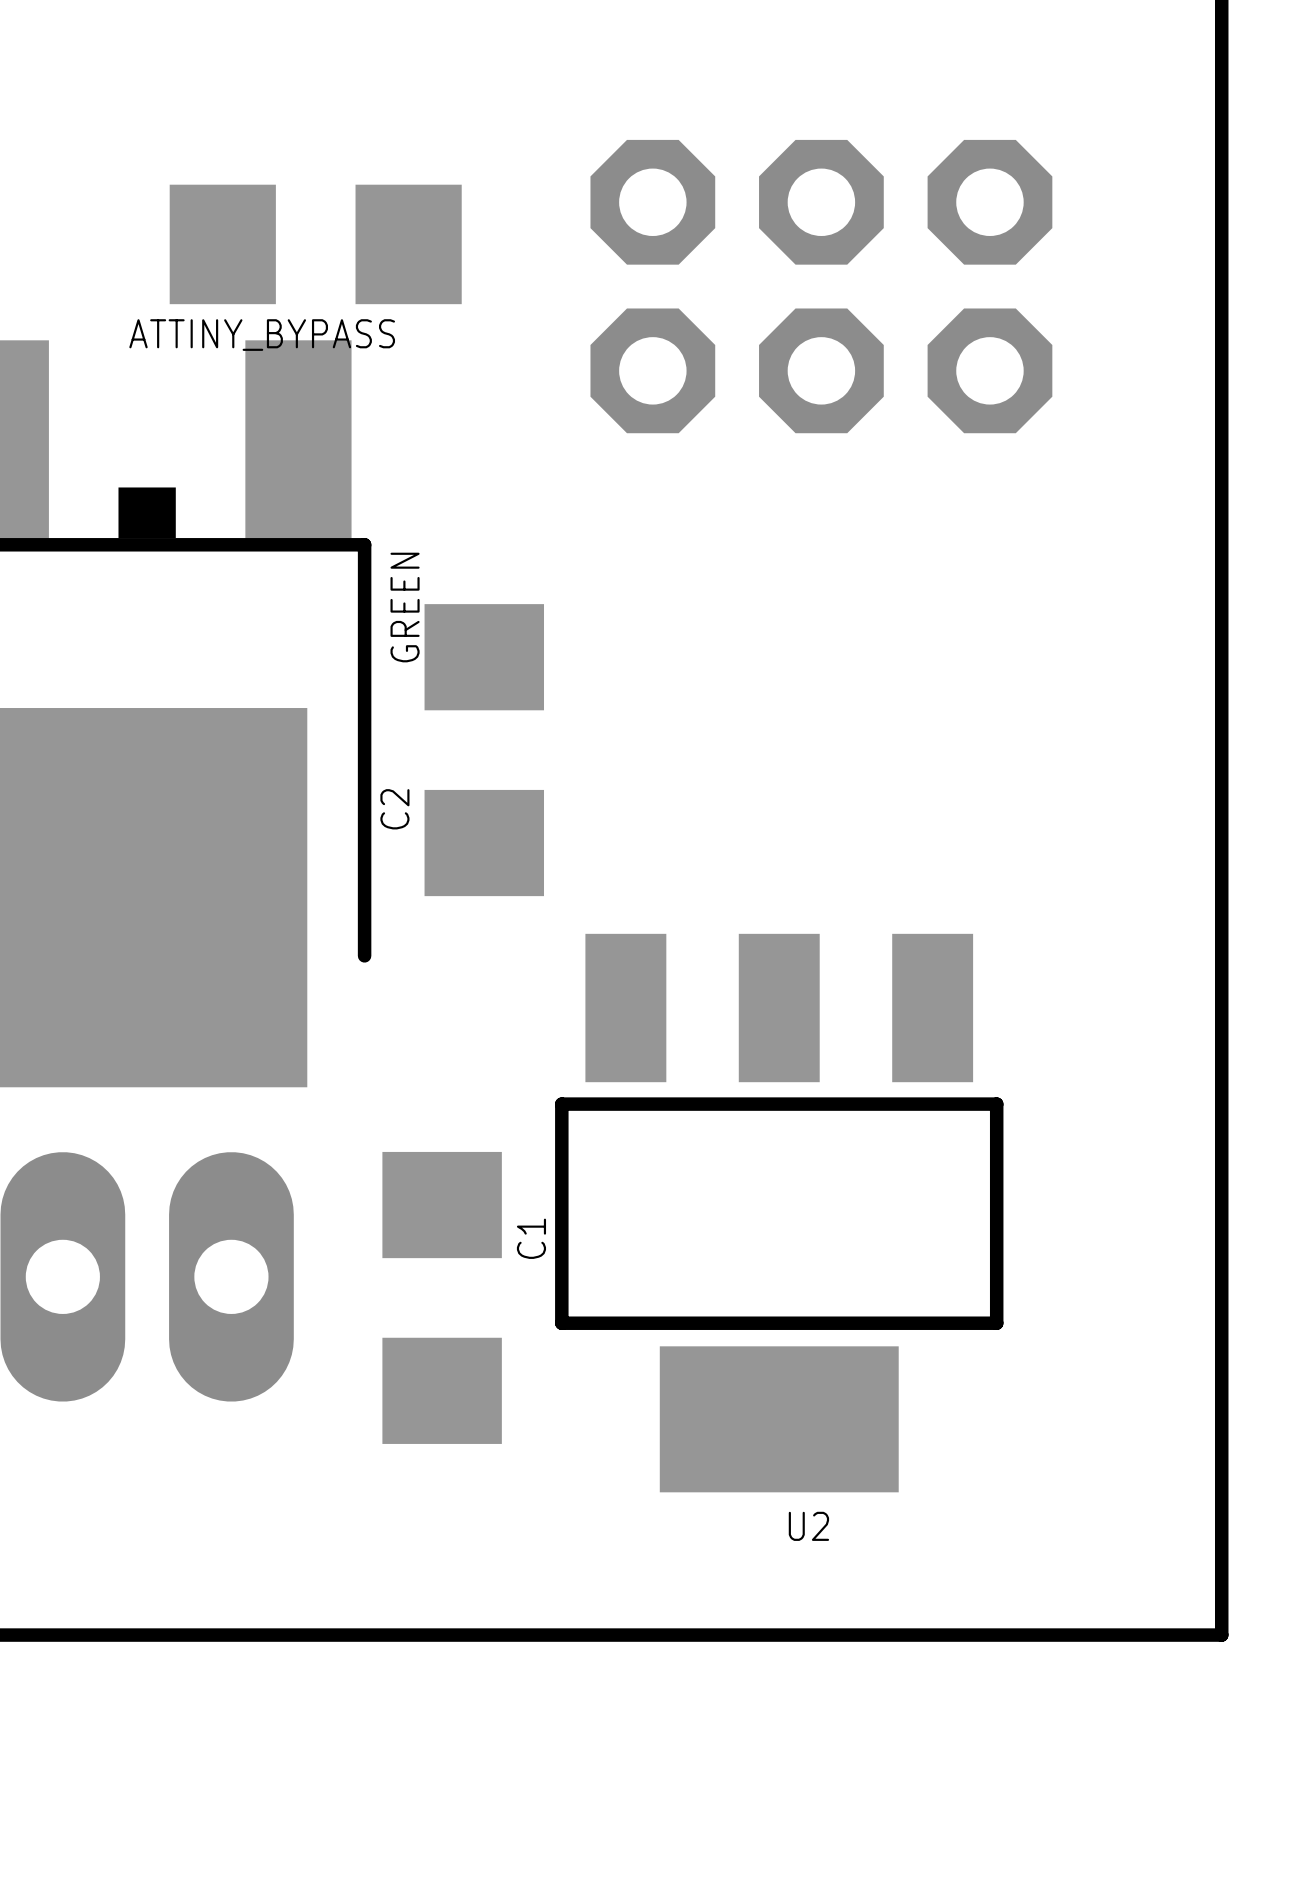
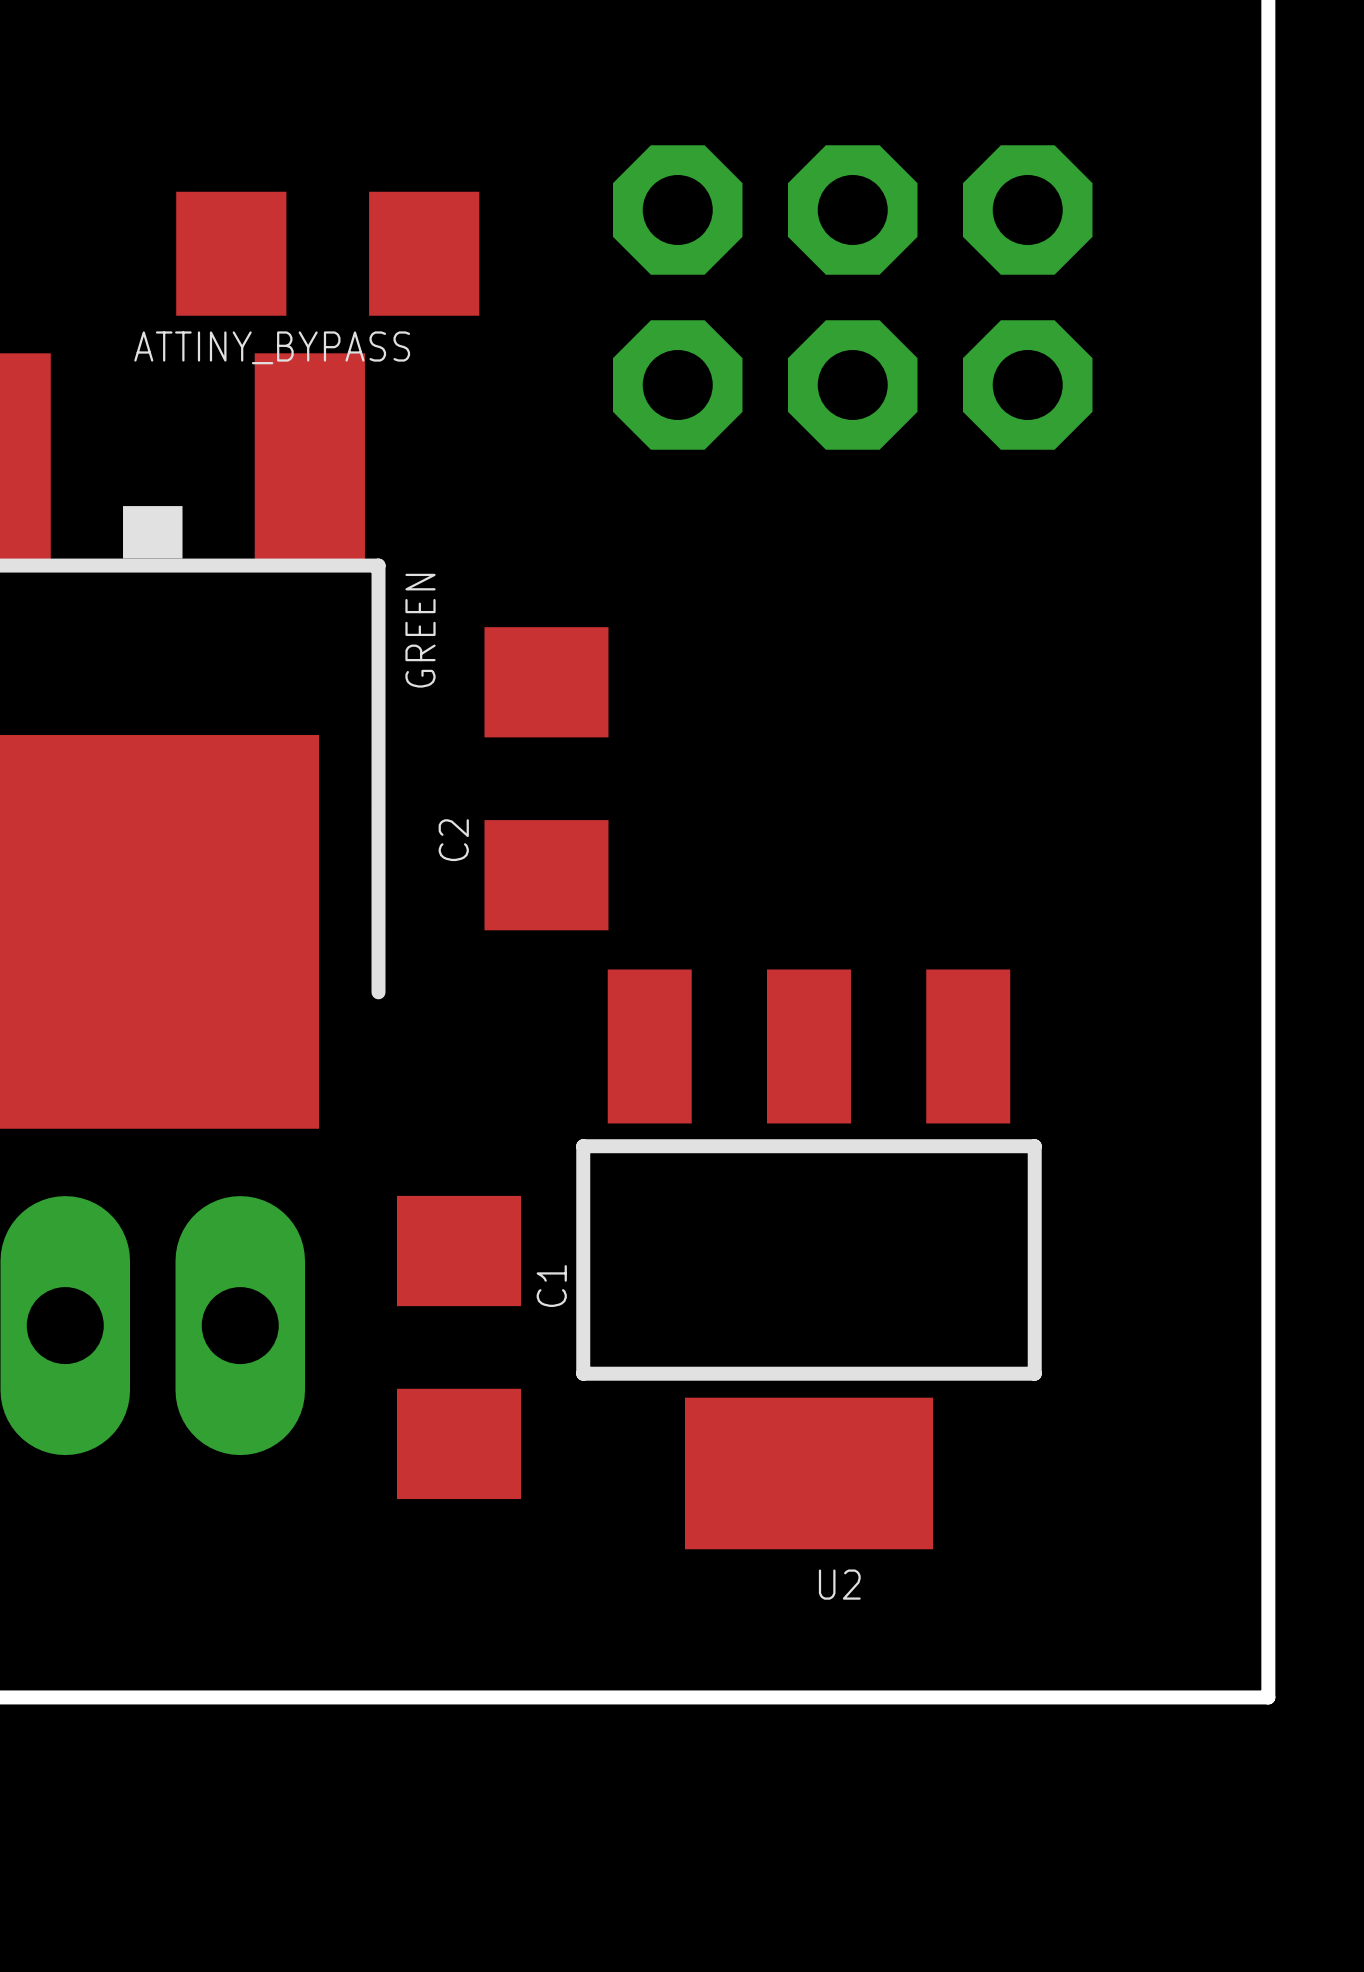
C2 position: (484, 750) -> (546, 778)

